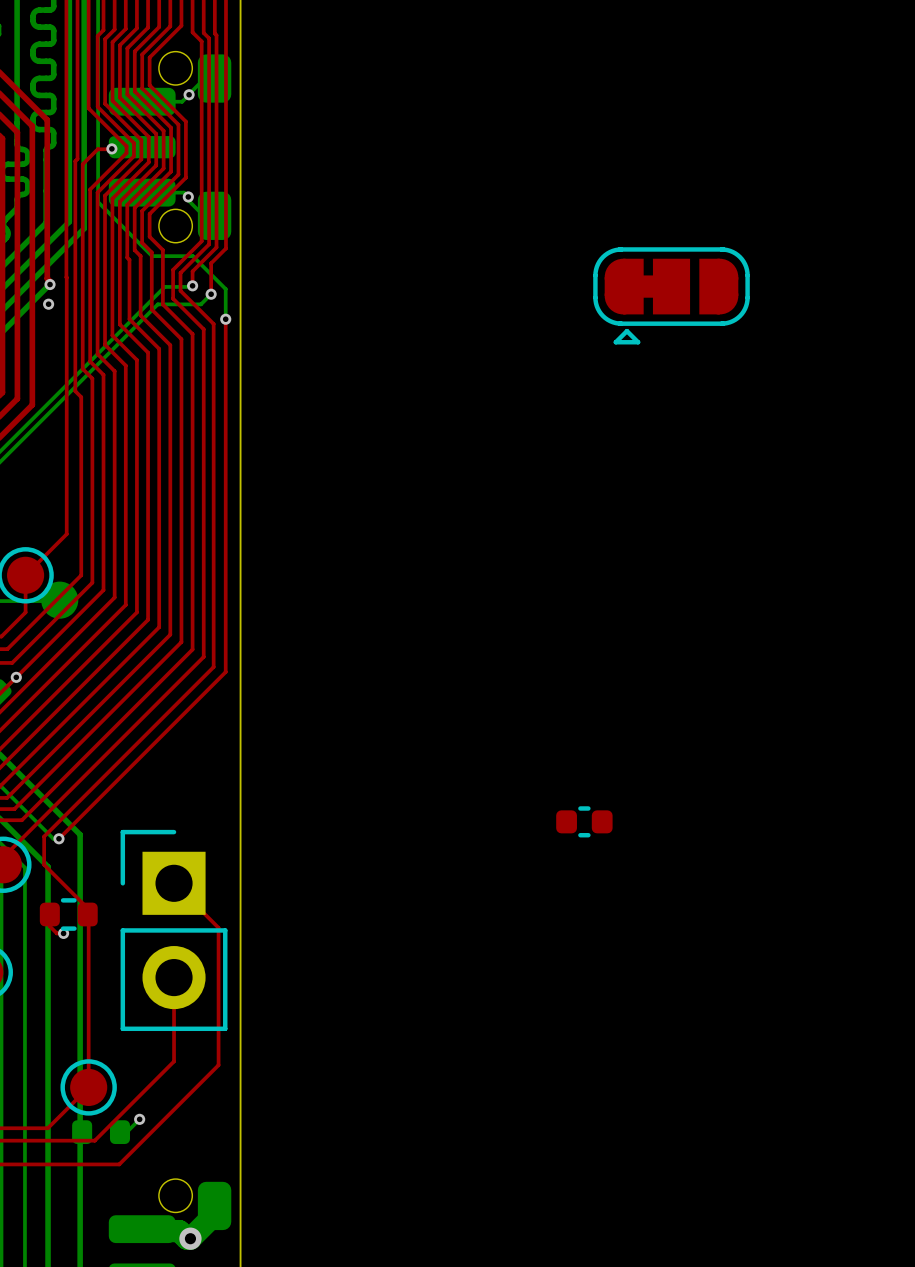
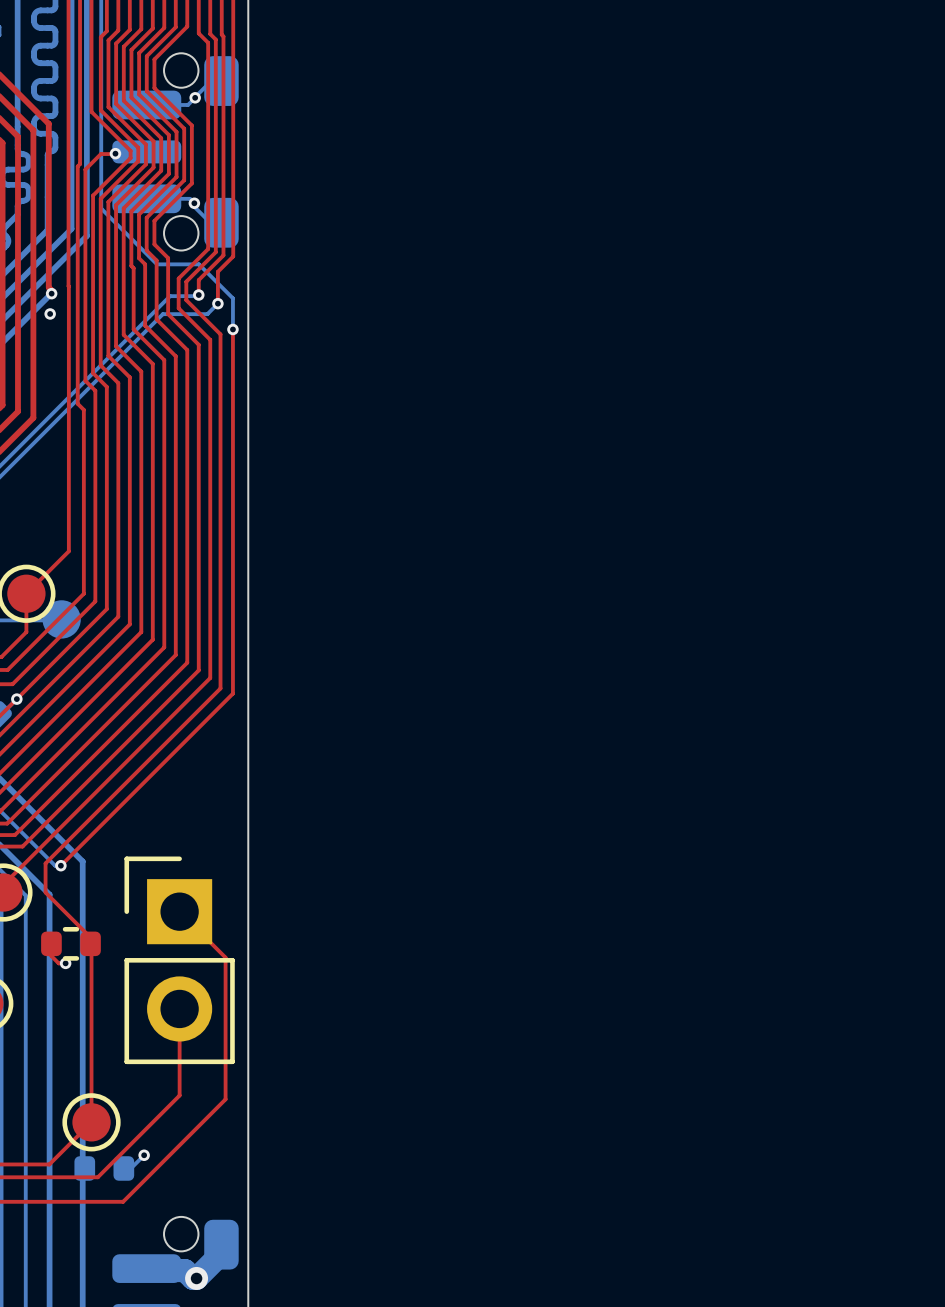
part: (671, 295) -> none
part: (584, 821) -> none

